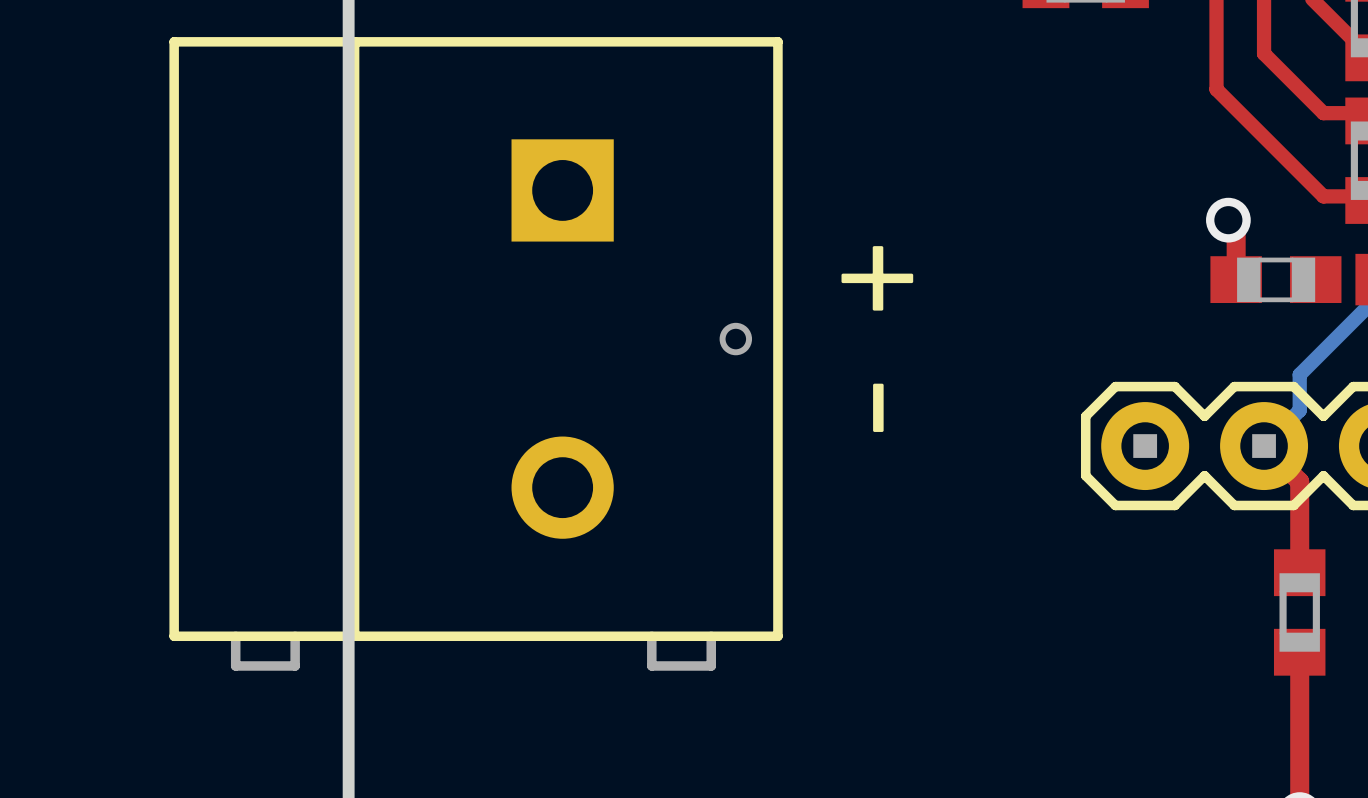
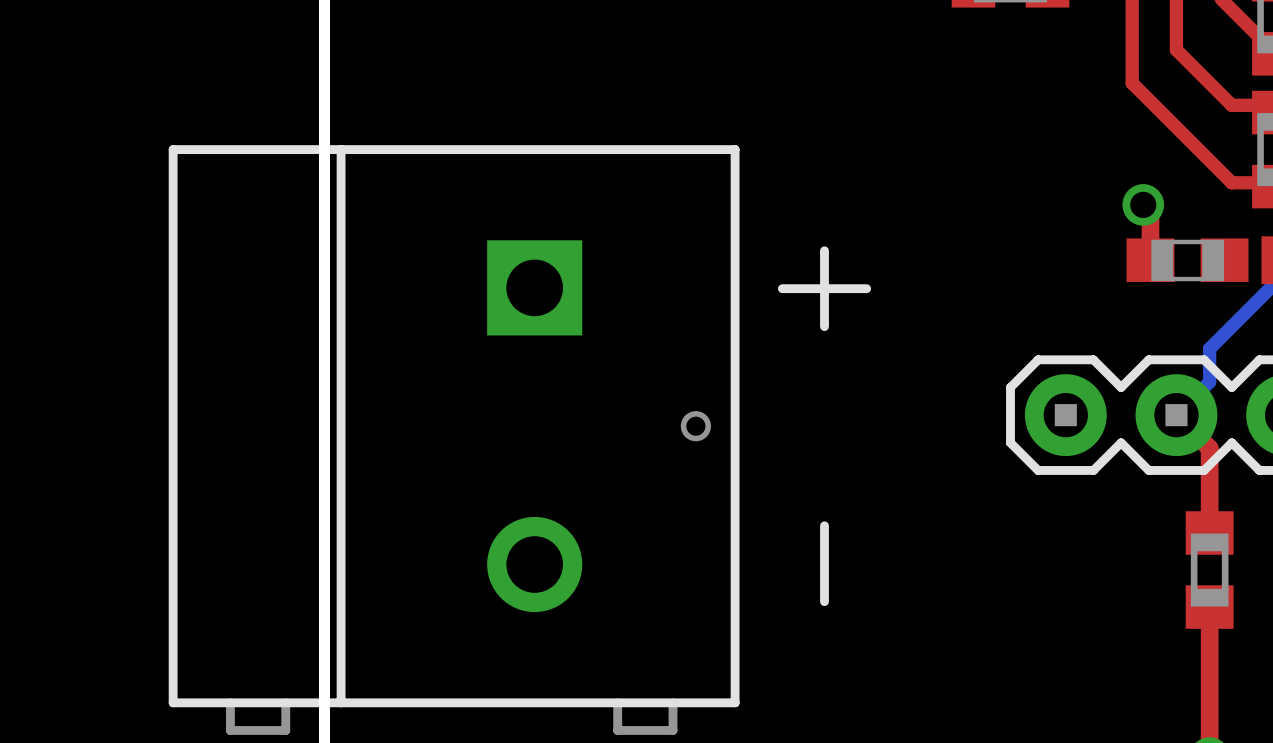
text position: - + (877, 339) -> - + (824, 426)
part position: (476, 353) -> (454, 440)

